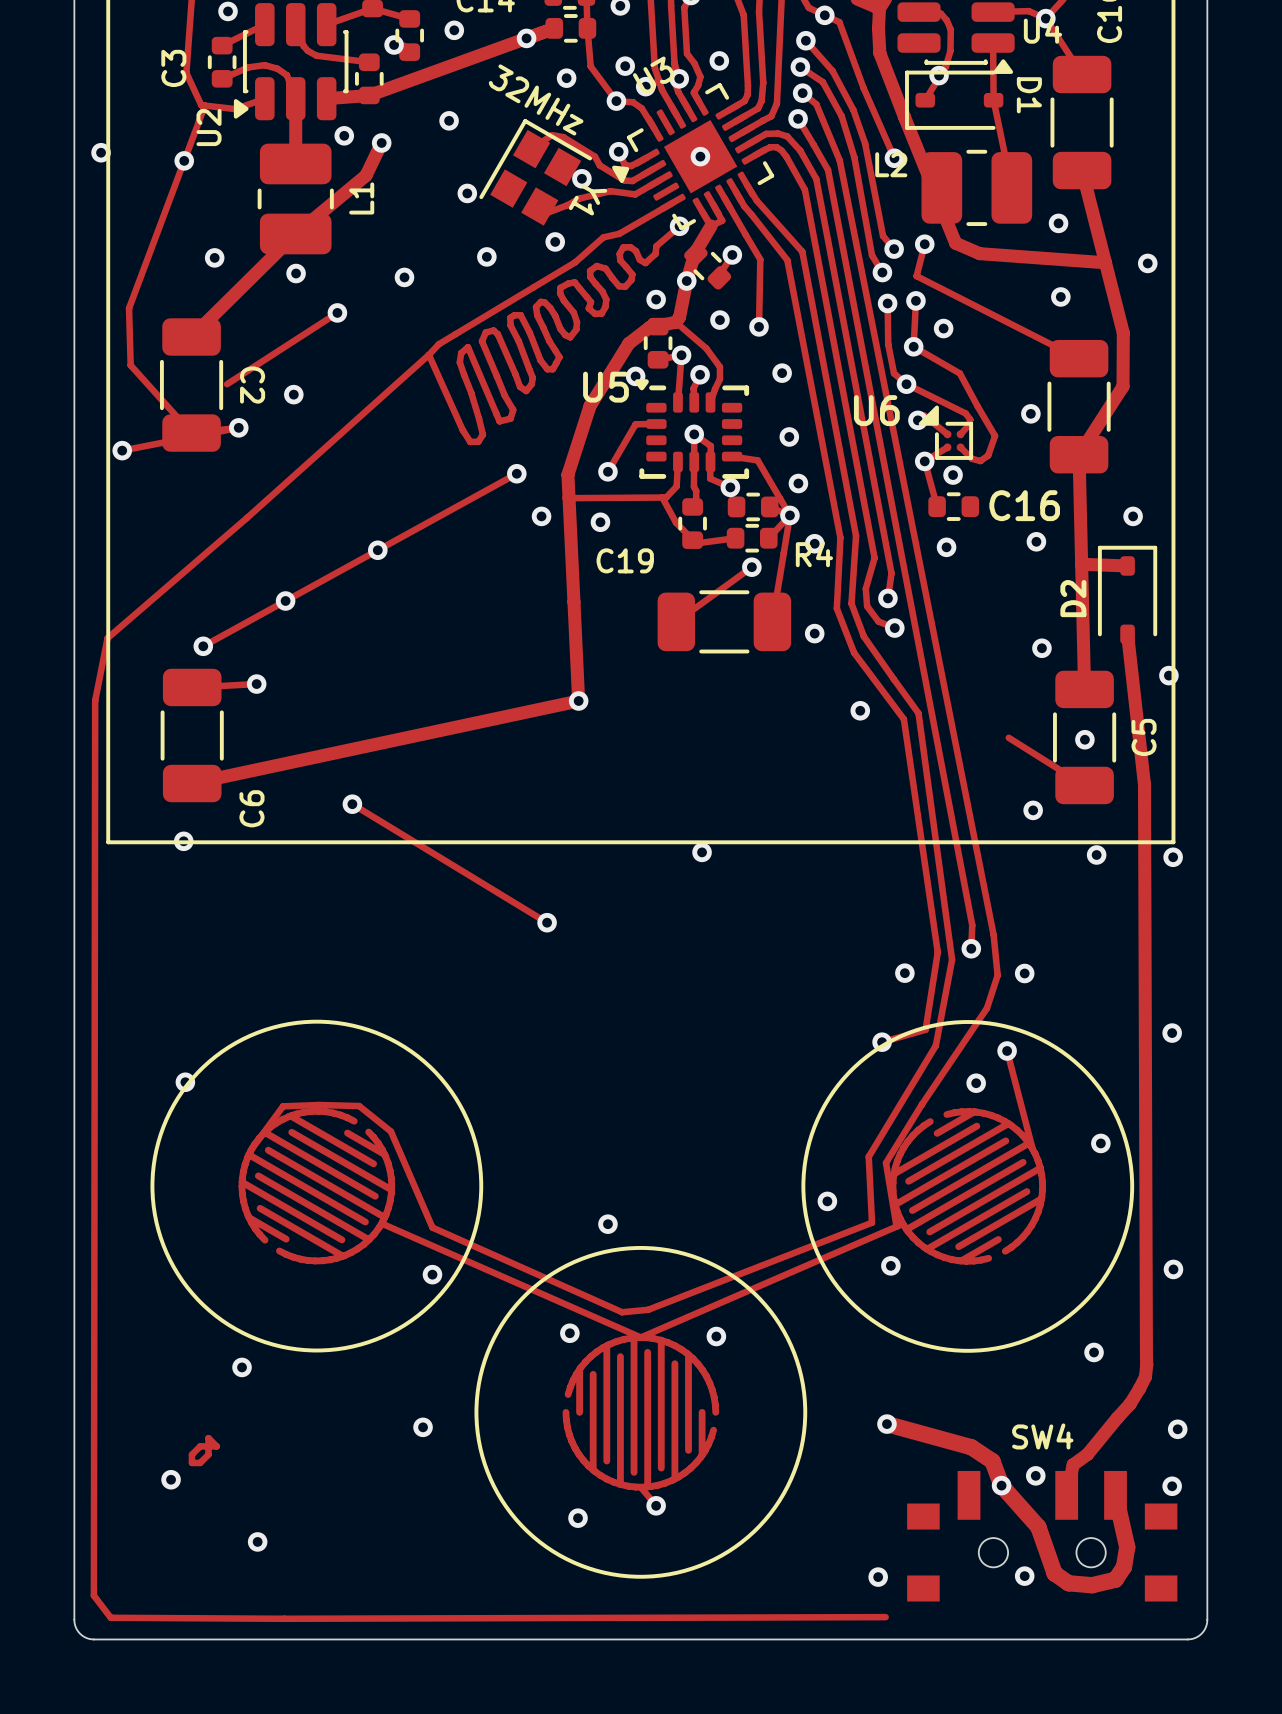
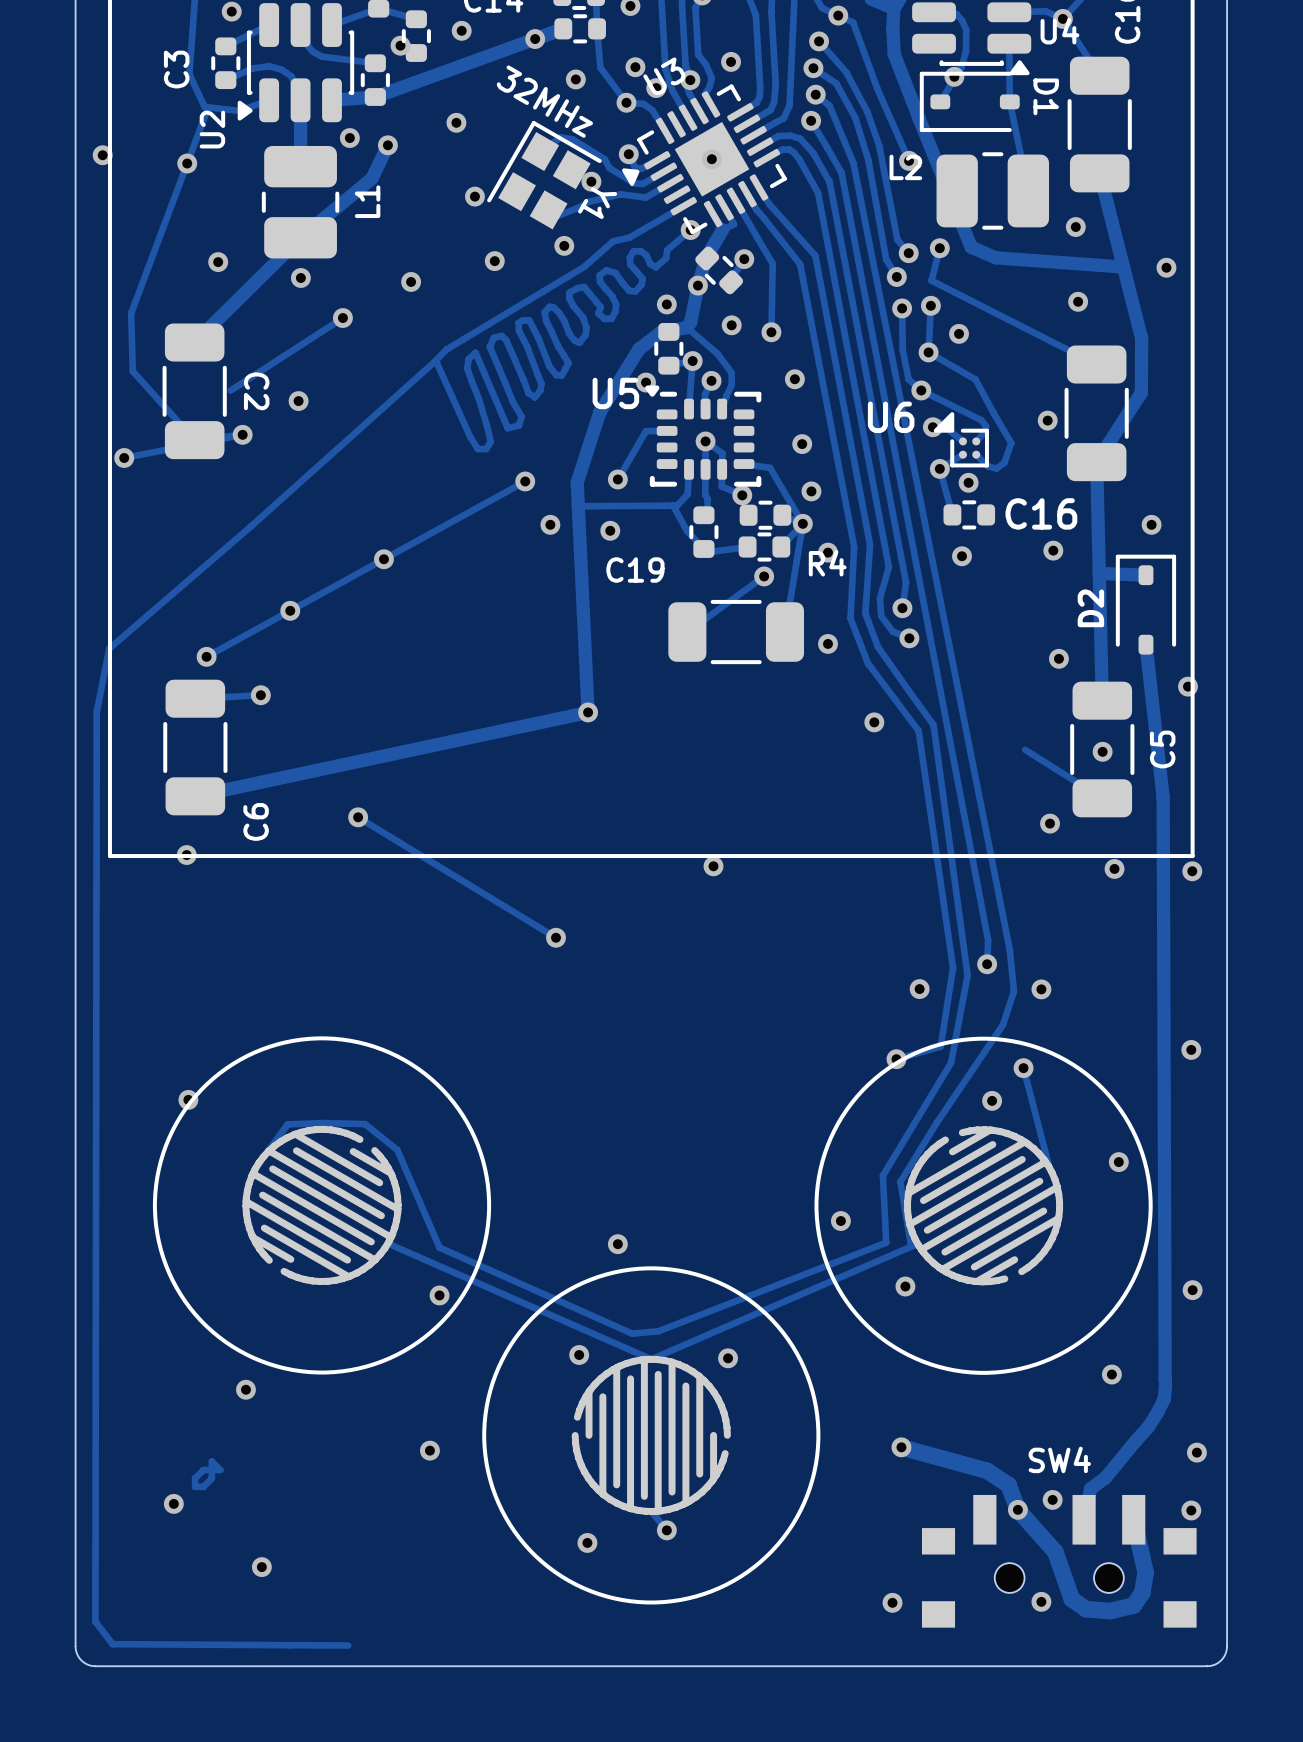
track: (885, 1617) (284, 1618) -> (348, 1645) (288, 1645)

